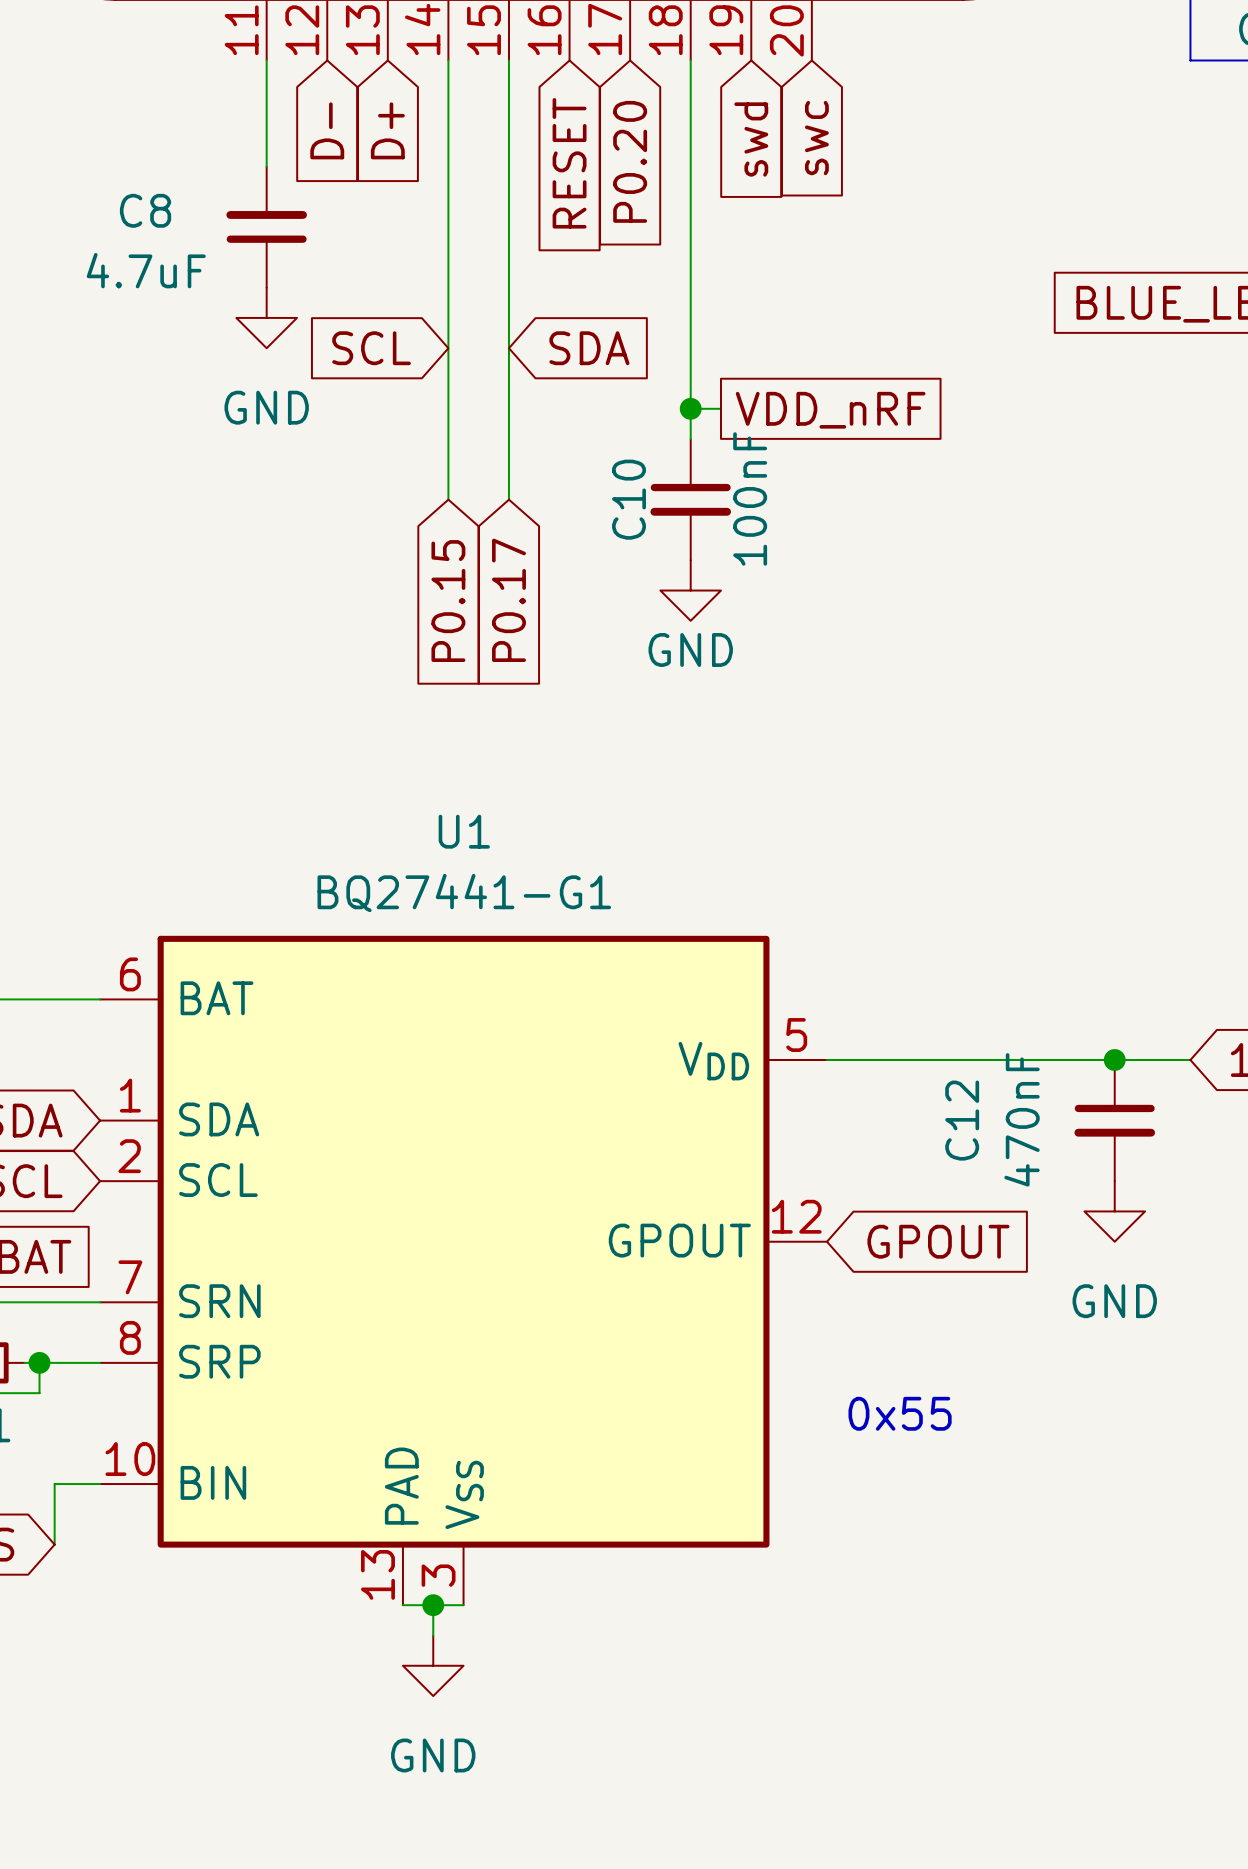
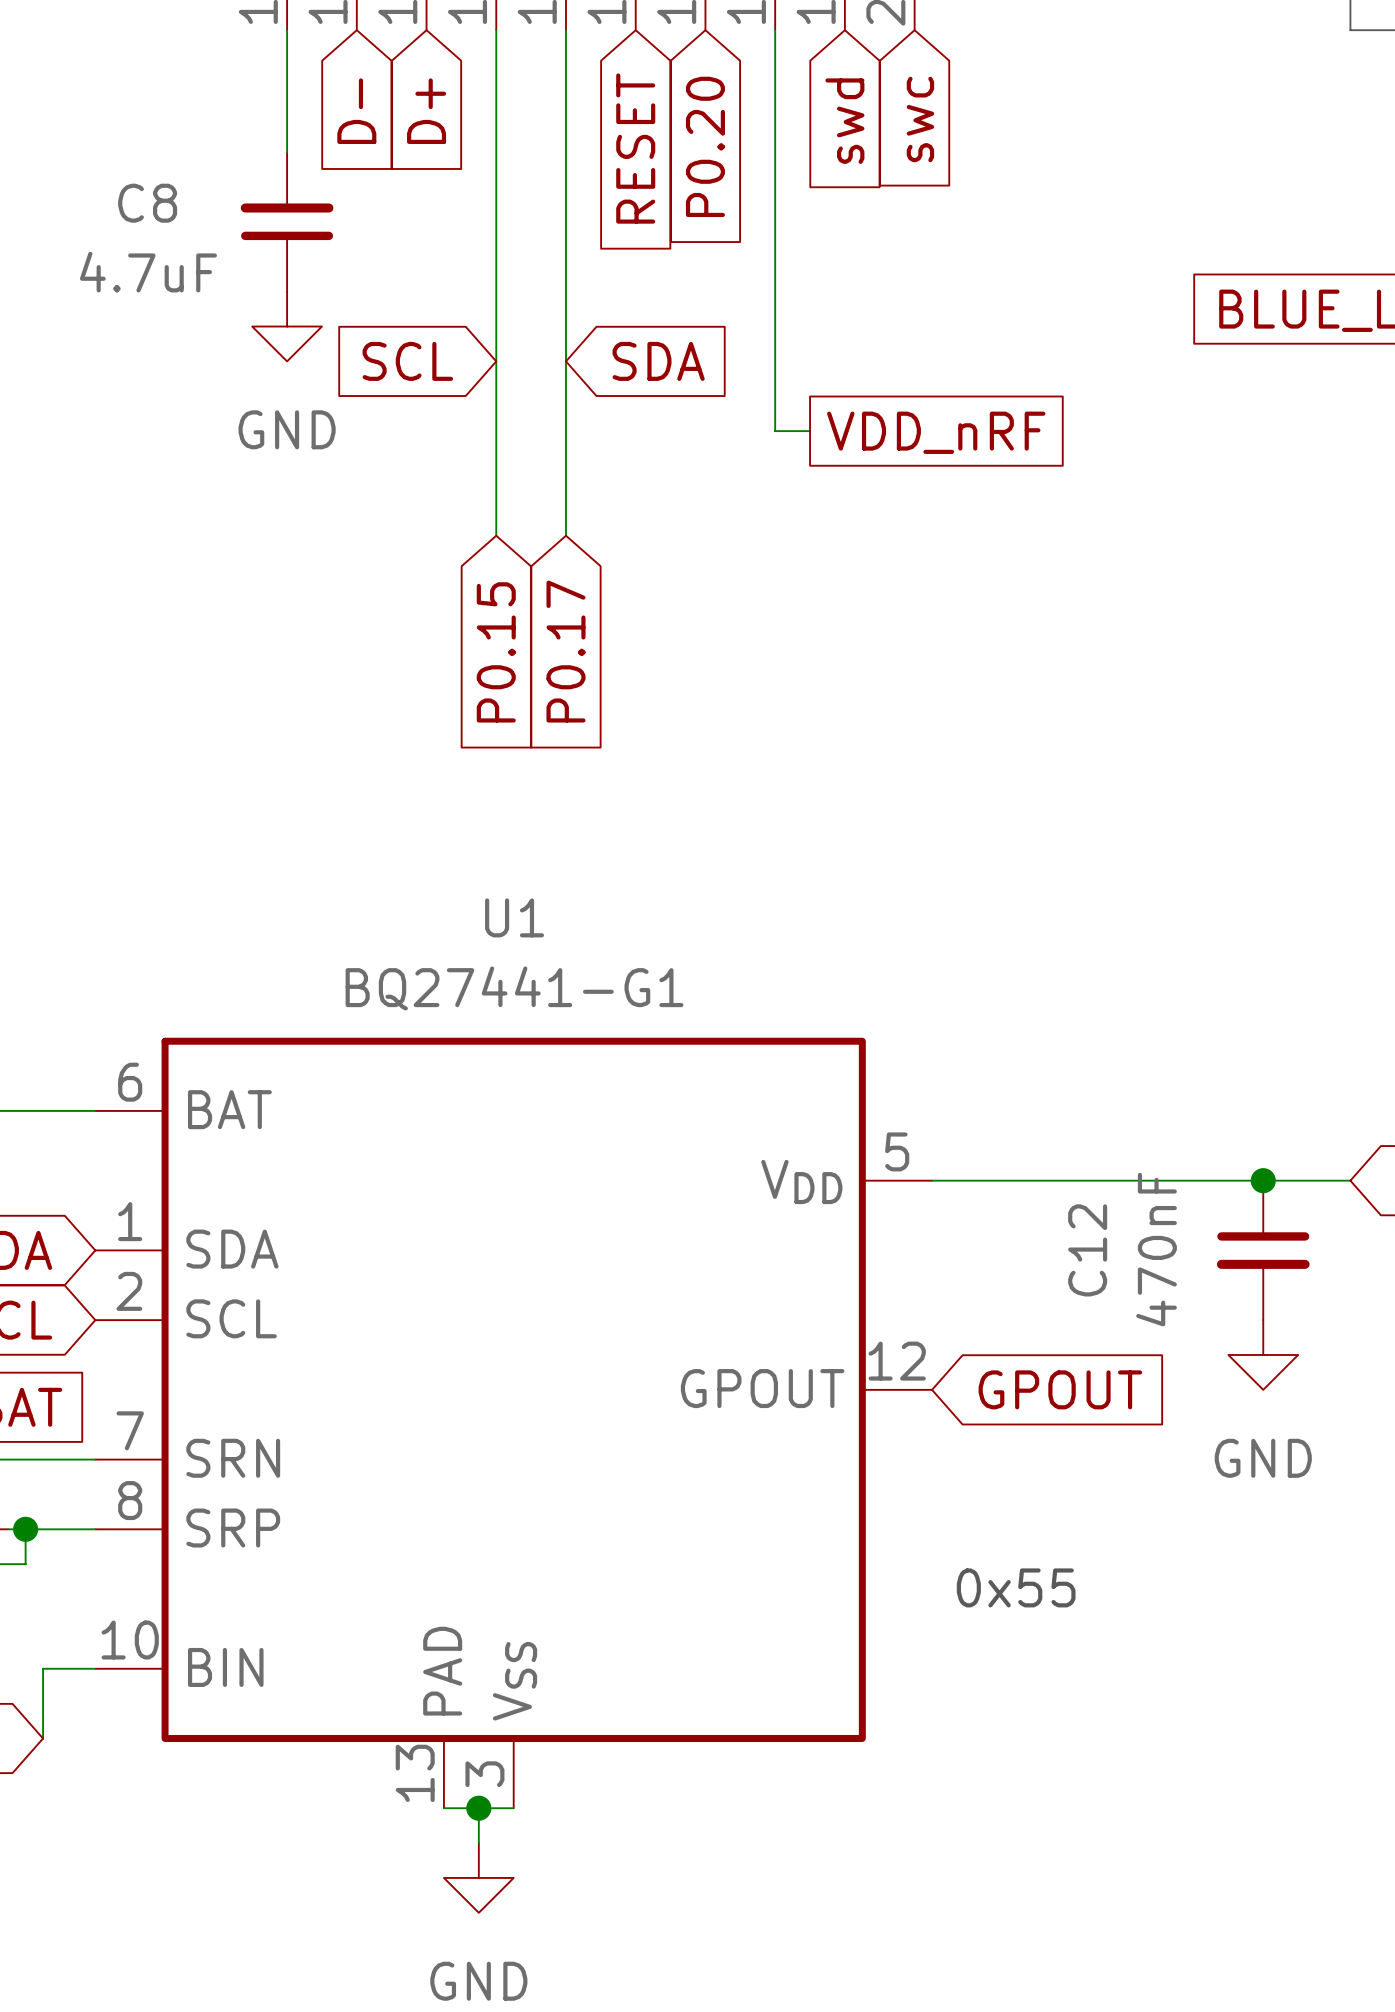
wire: (690, 408) (690, 439) -> none
junction: (690, 408) -> none
C10: 100nF (690, 499) -> none
power symbol: GND (690, 590) -> none

